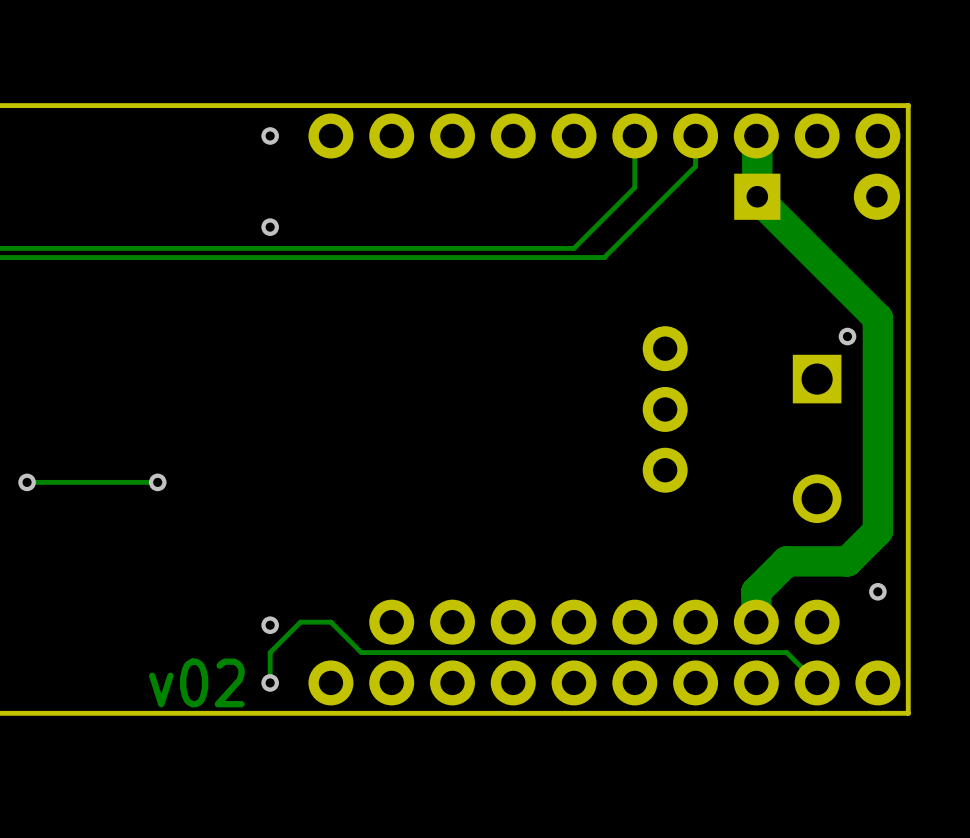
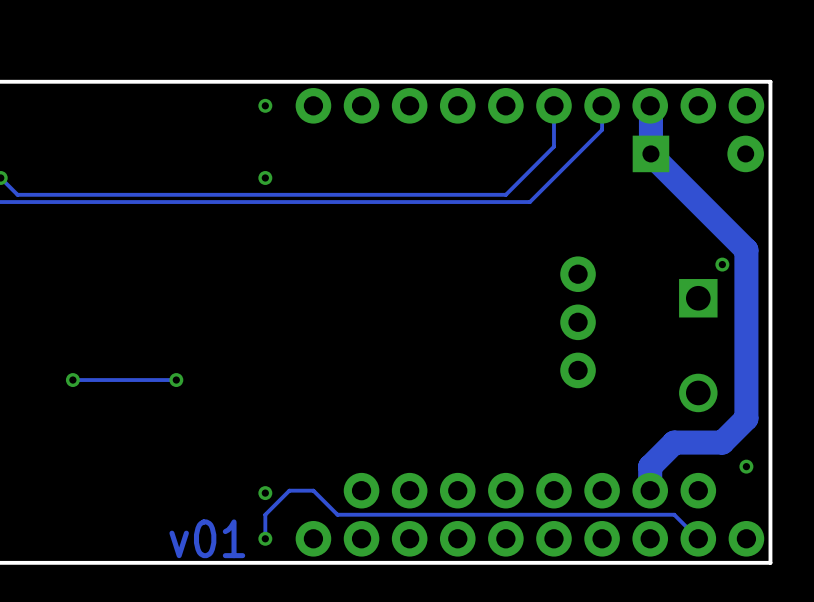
text: v02 (196, 682) -> v01 (207, 538)

